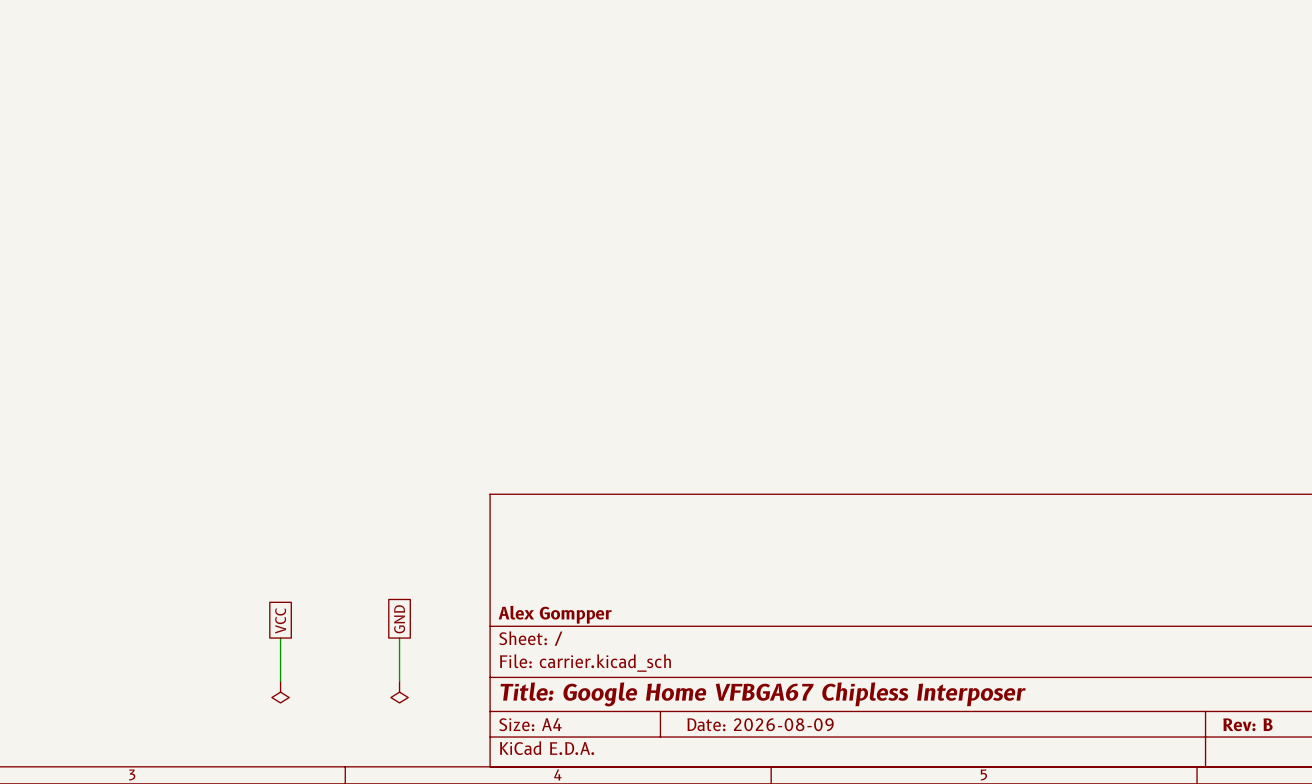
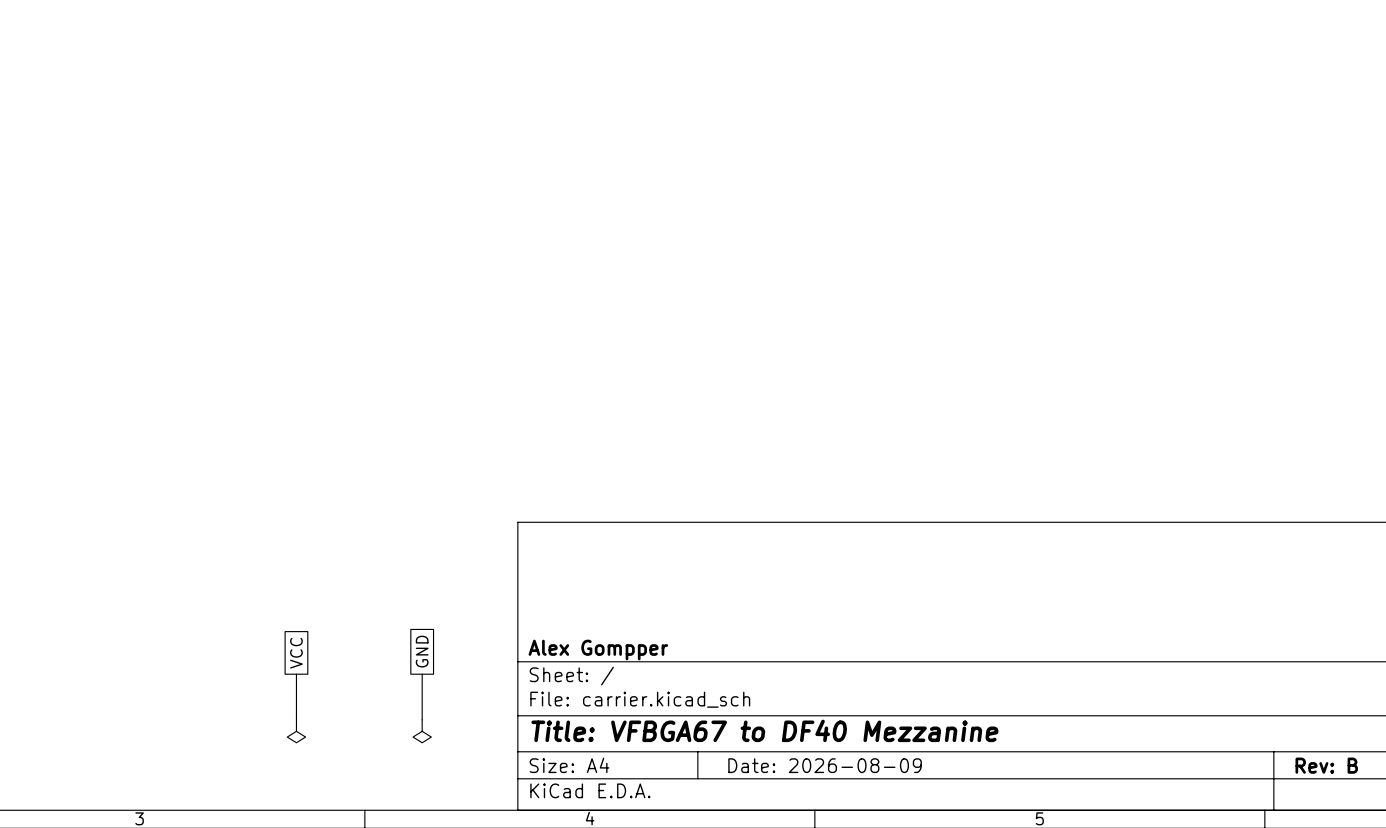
title block: Title: Google Home VFBGA67 Chipless Interposer (763, 694) -> Title: VFBGA67 to DF40 Mezzanine (764, 730)

